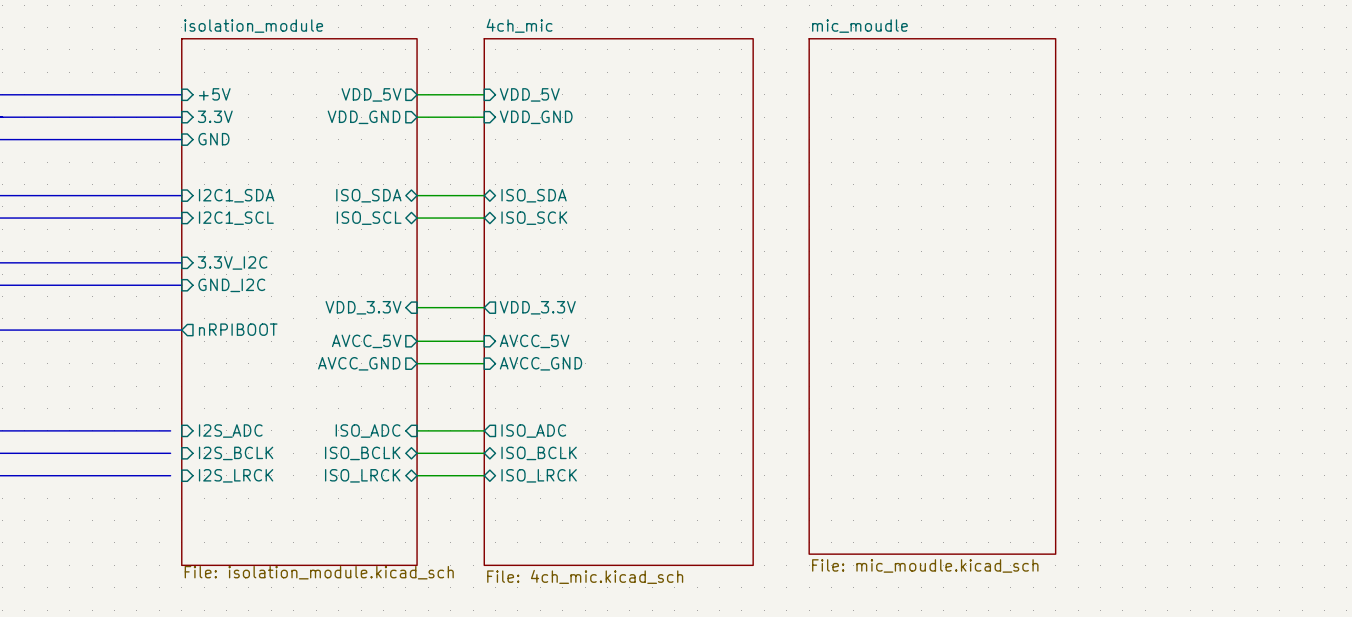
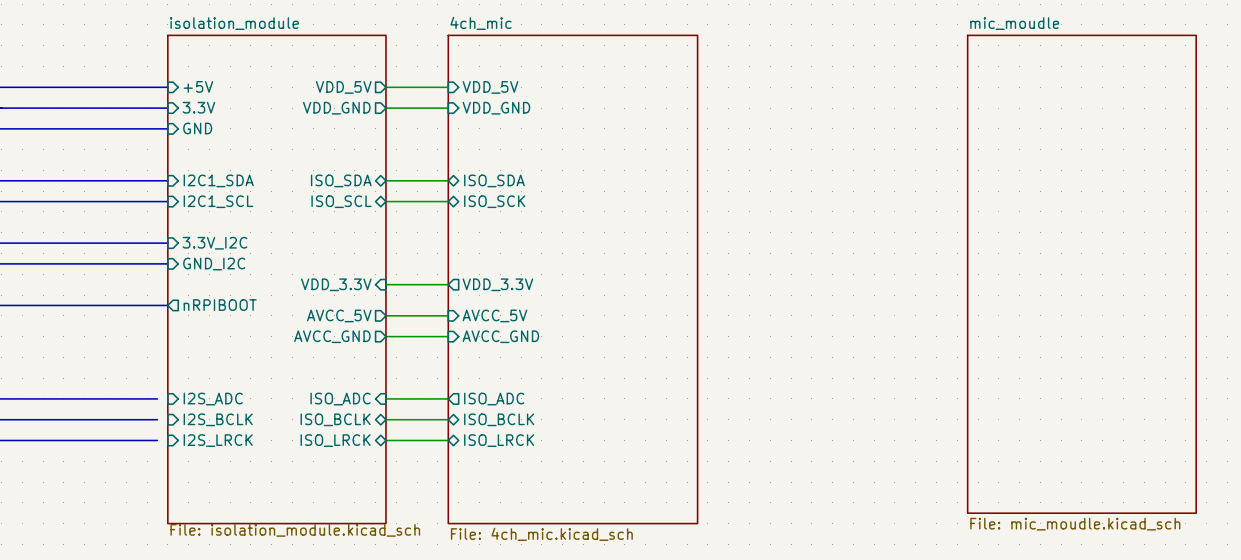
sheet mic_moudle: File: mic_moudle.kicad_sch (932, 296) -> none
sheet mic_moudle: none -> File: mic_moudle.kicad_sch (1081, 274)

